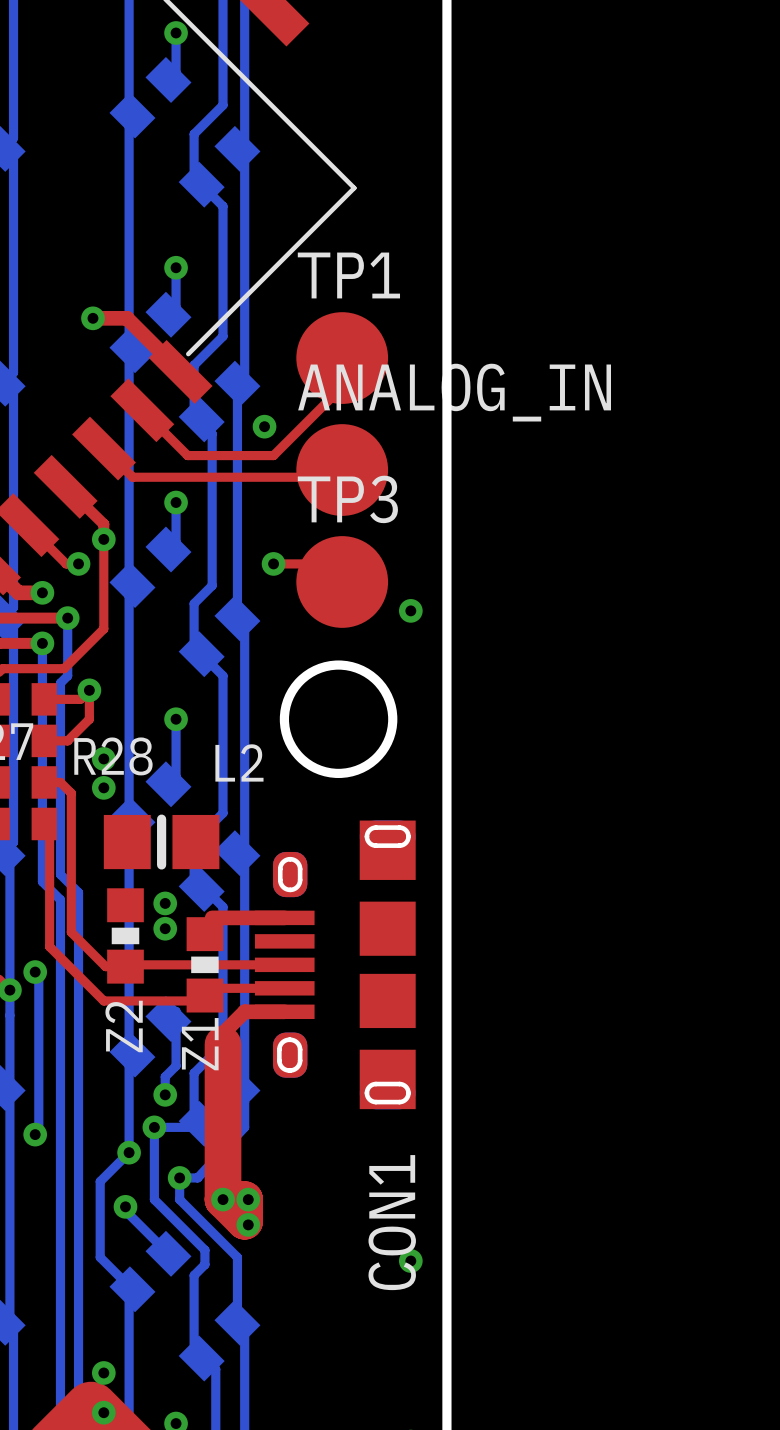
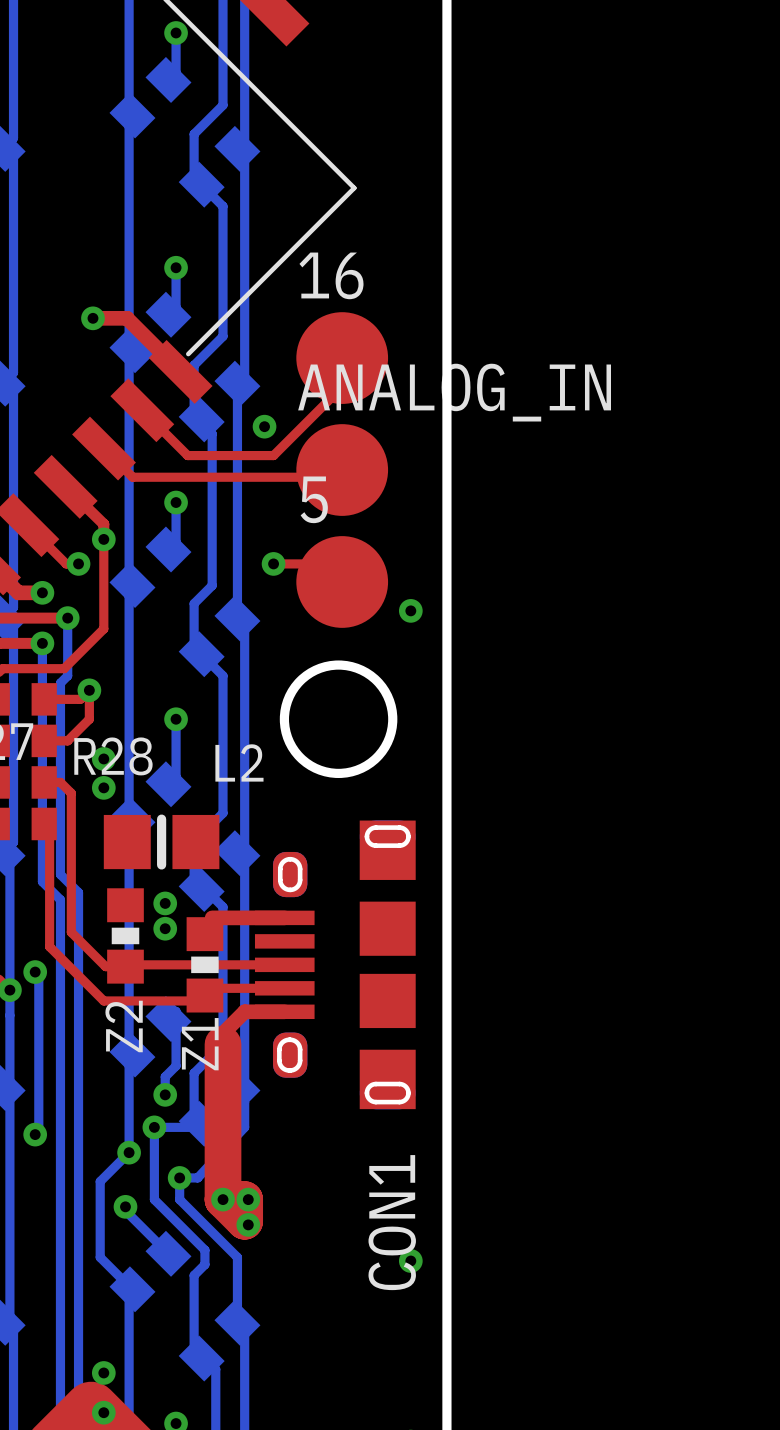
TP1 name: TP1 (348, 275) -> 16 (331, 275)
TP3 name: TP3 (347, 499) -> 5 (314, 499)

